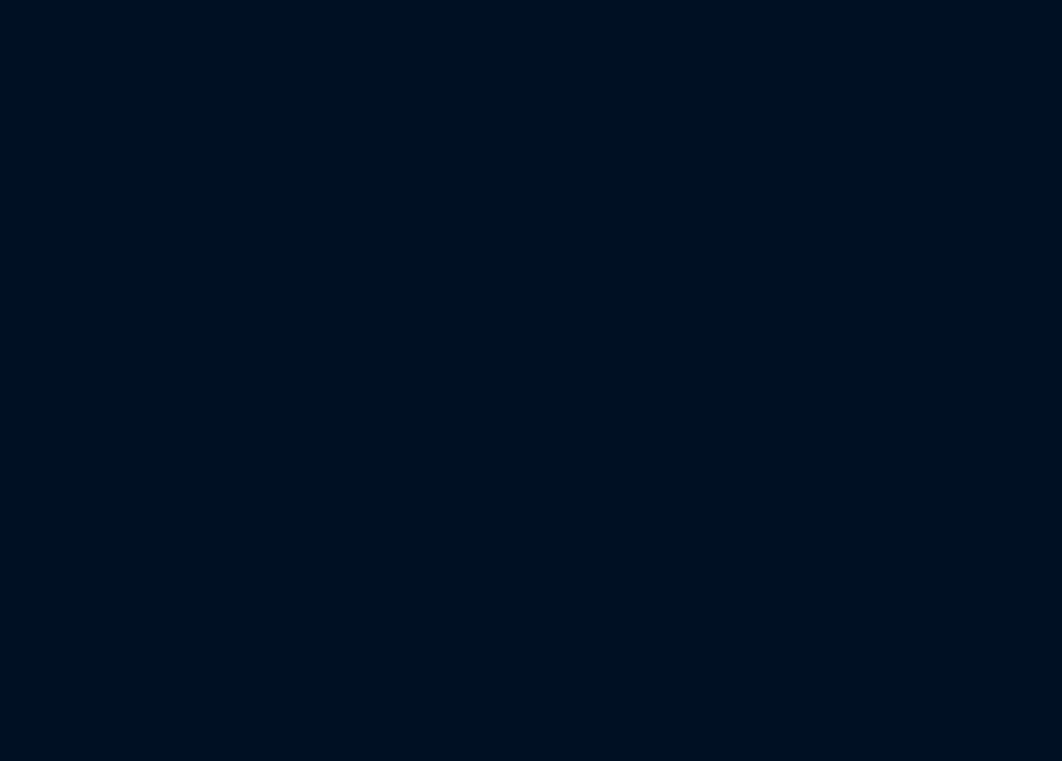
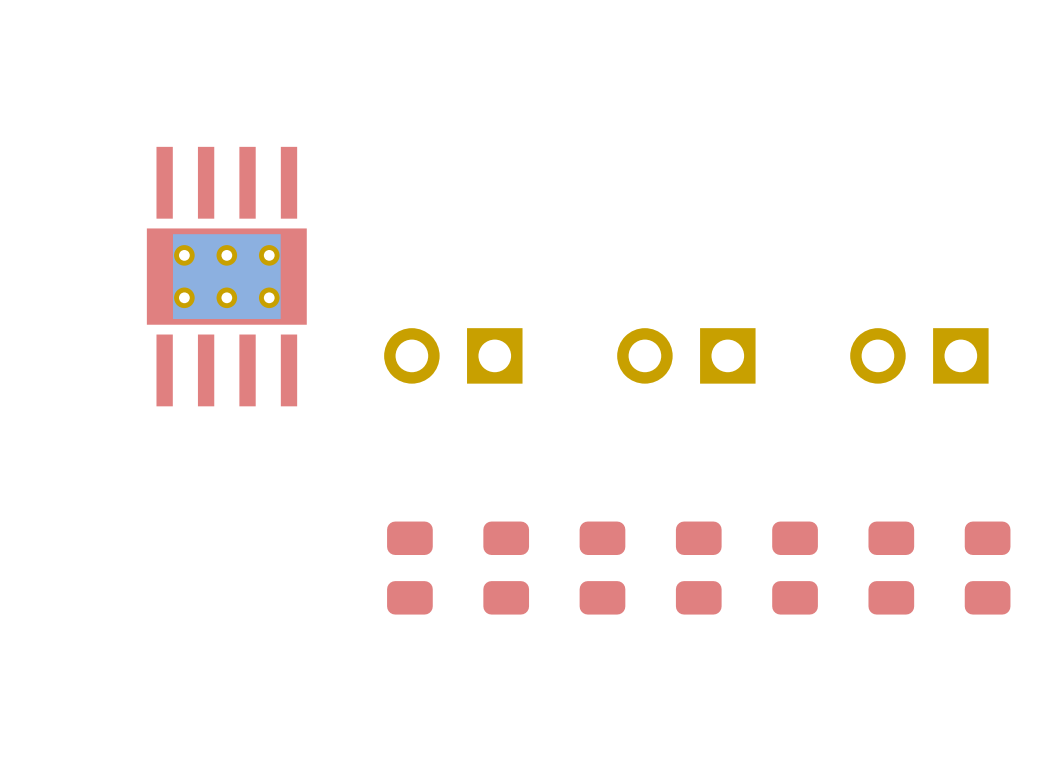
part: none -> (226, 276)
part: none -> (453, 355)
part: none -> (686, 355)
part: none -> (919, 355)
part: none -> (409, 568)
part: none -> (506, 568)
part: none -> (602, 568)
part: none -> (698, 568)
part: none -> (795, 568)
part: none -> (891, 568)
part: none -> (987, 568)

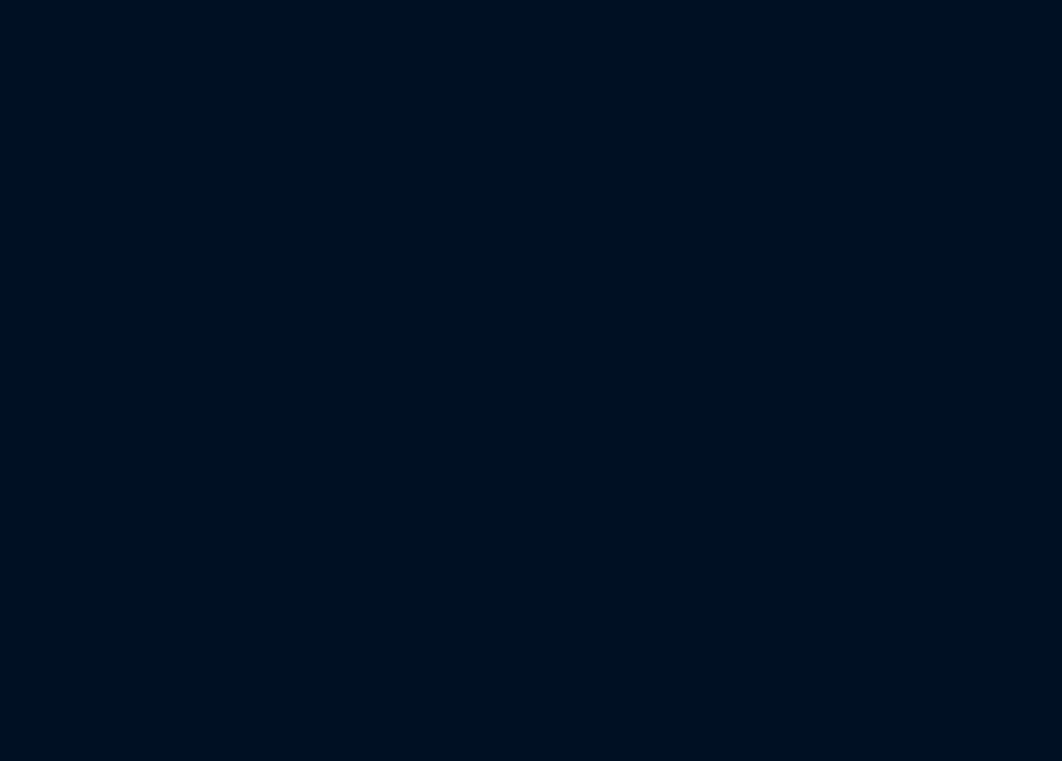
part: (226, 276) -> none
part: (453, 355) -> none
part: (686, 355) -> none
part: (919, 355) -> none
part: (409, 568) -> none
part: (506, 568) -> none
part: (602, 568) -> none
part: (698, 568) -> none
part: (795, 568) -> none
part: (891, 568) -> none
part: (987, 568) -> none

